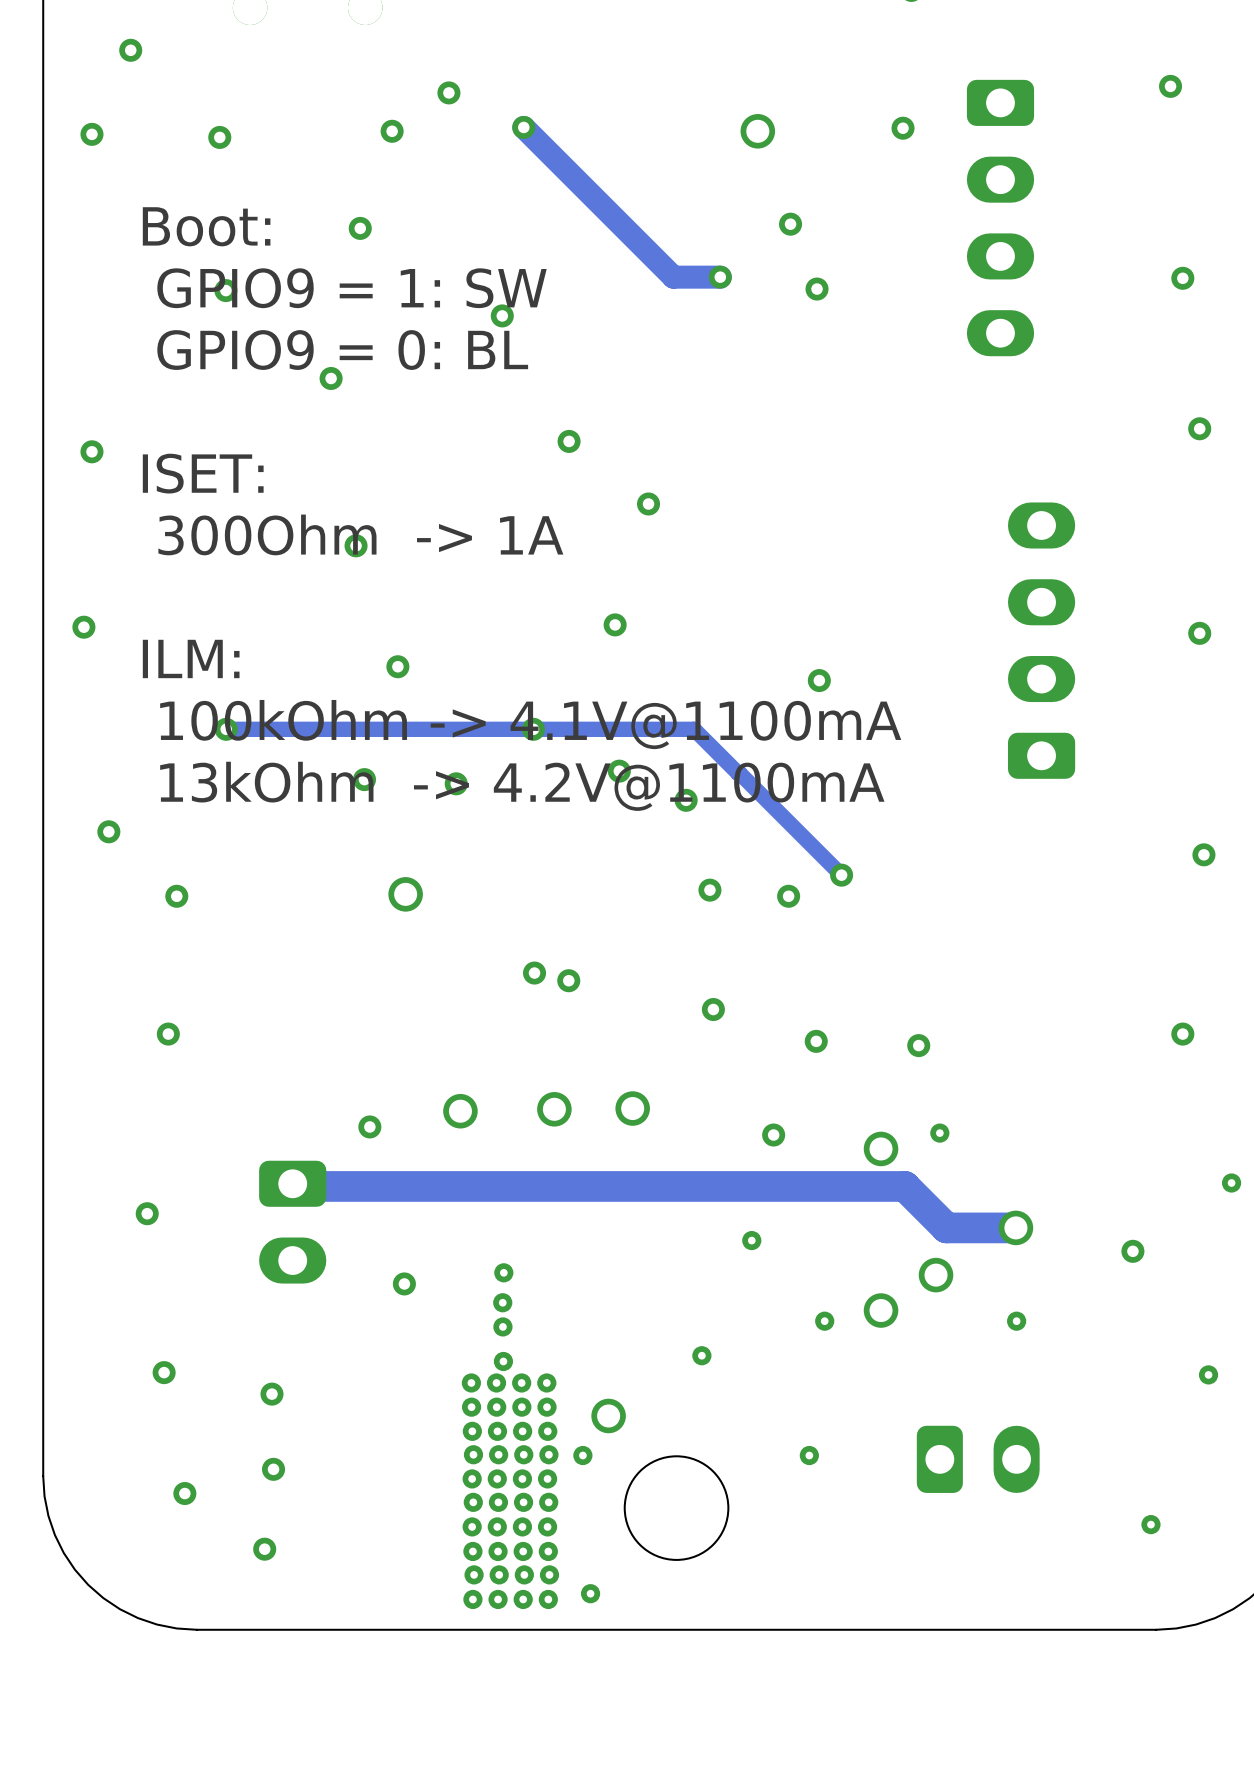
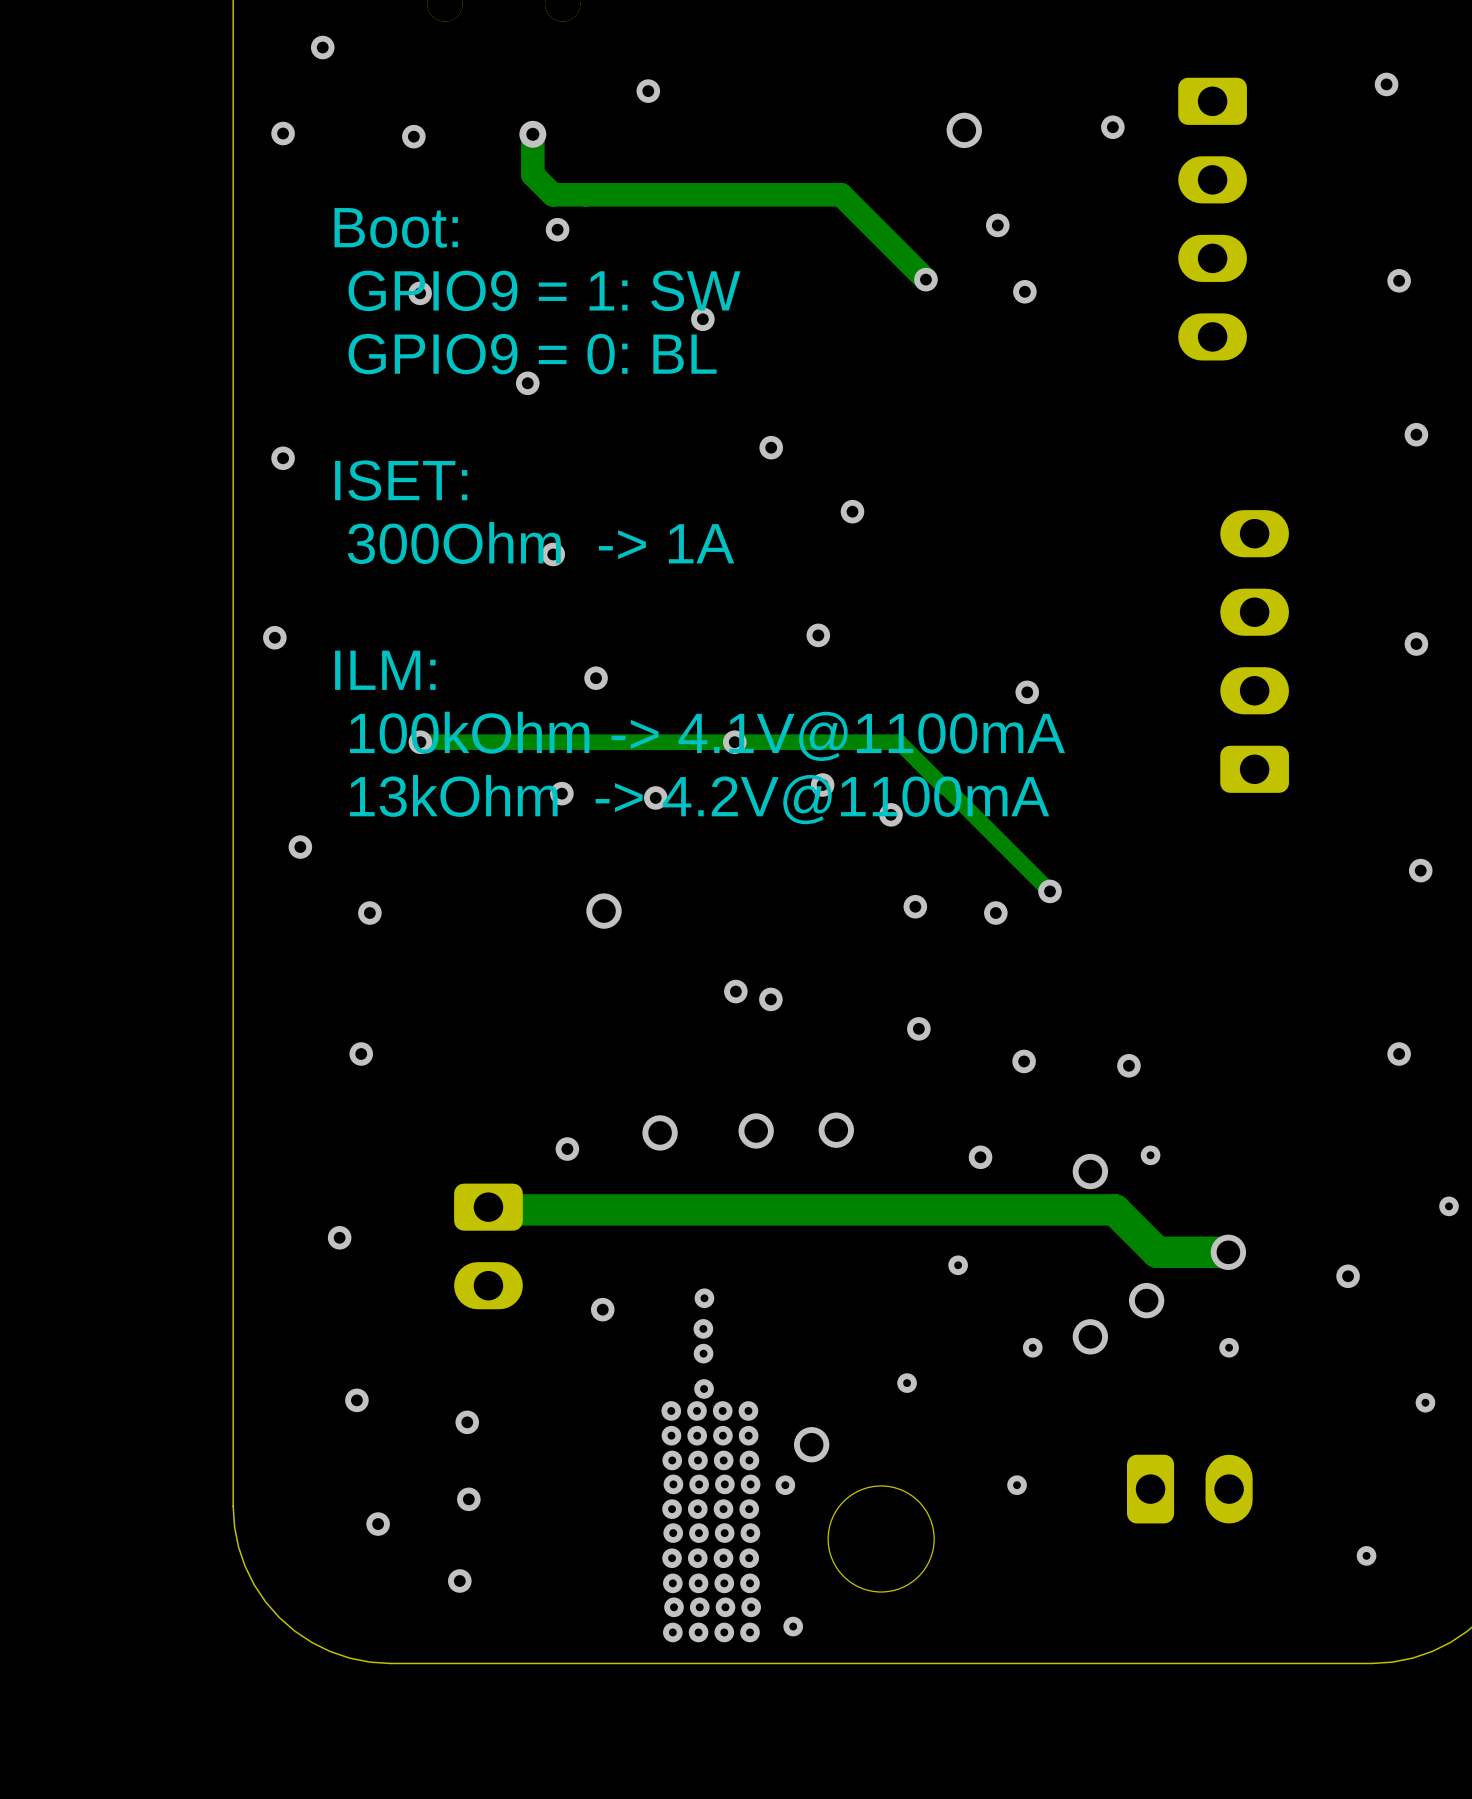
track: (523, 127) (673, 277) (720, 277) -> (532, 134) (532, 174) (552, 194) (841, 194) (925, 279)
via: (523, 127) -> none
via: (392, 131) -> none
via: none -> (532, 134)

